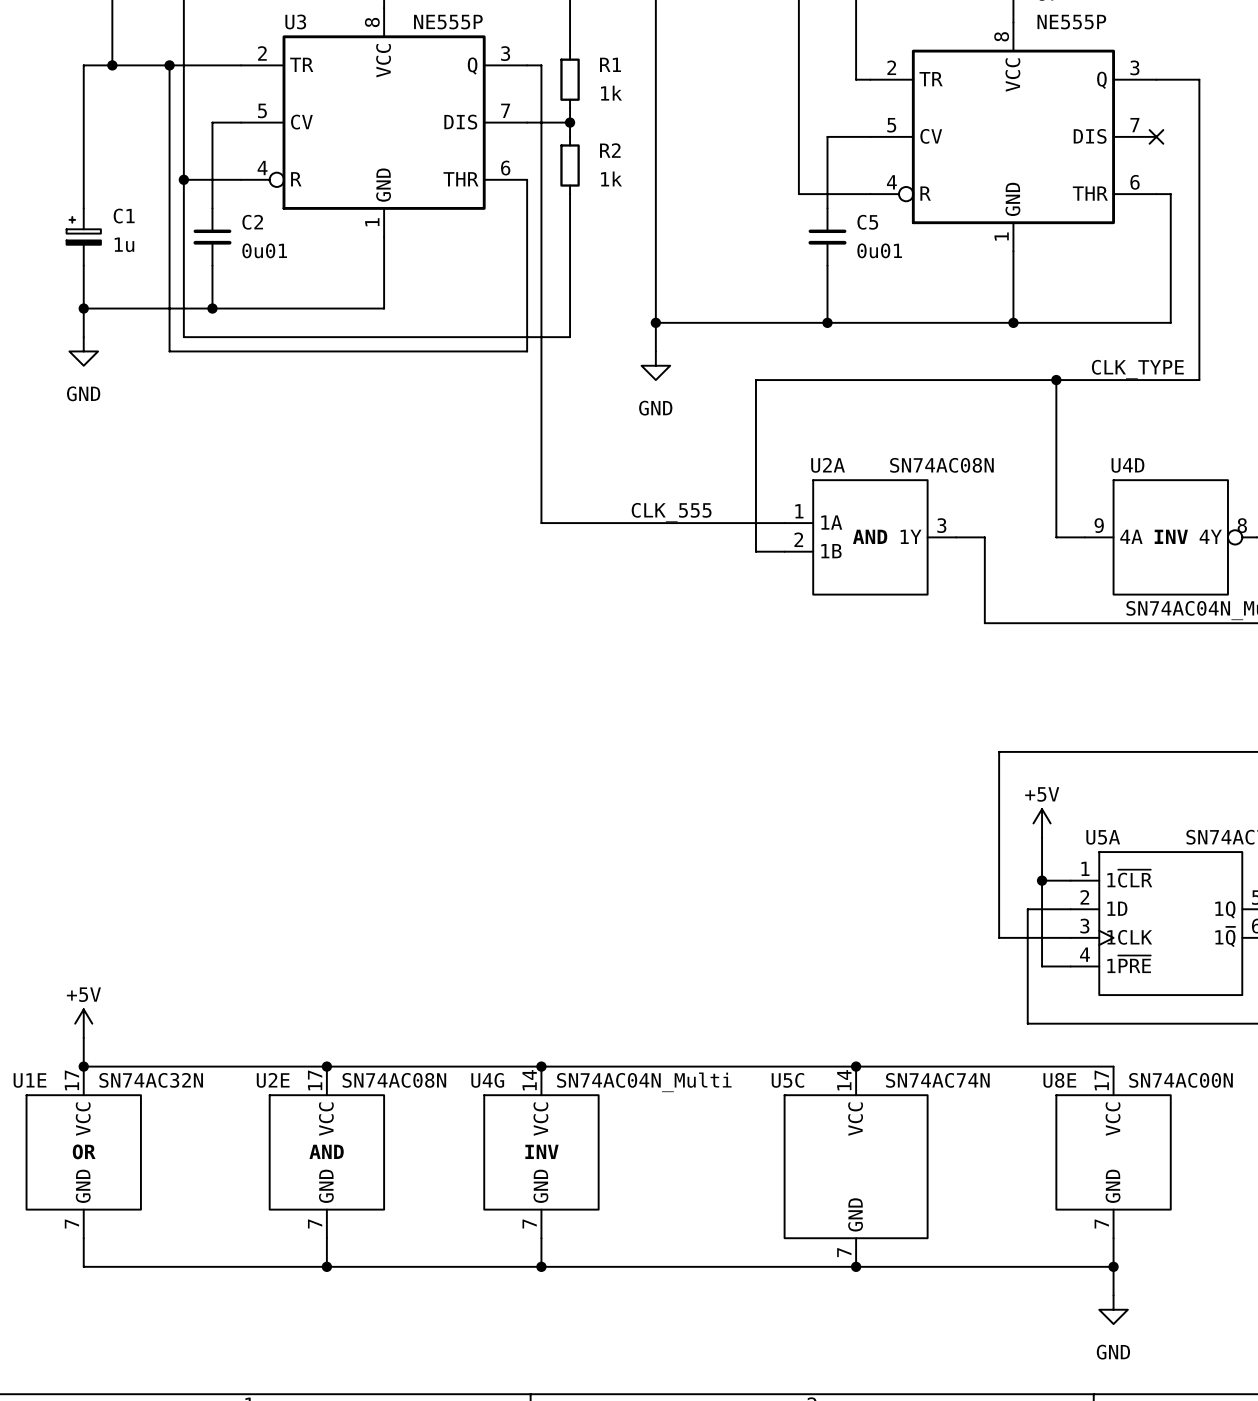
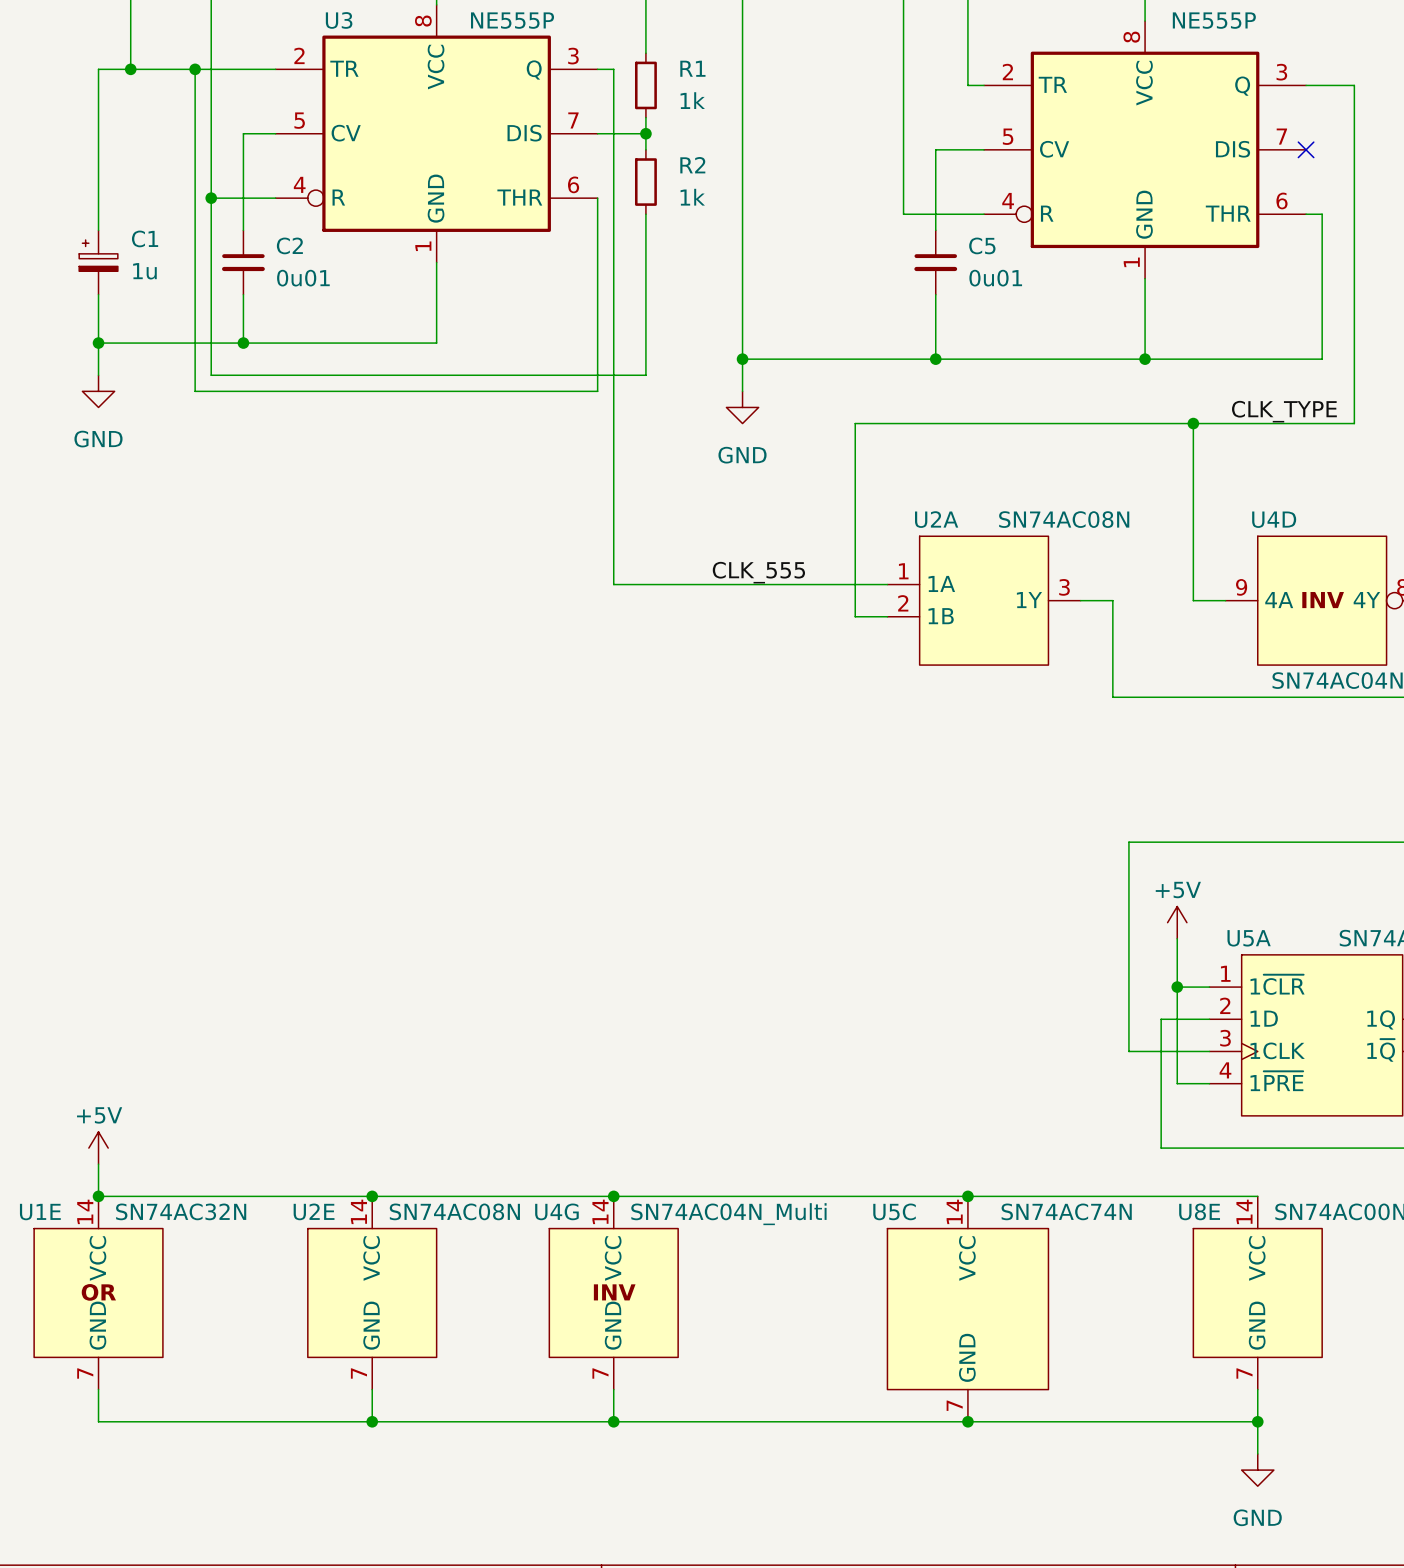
U2A text: AND (870, 536) -> none
U1E pin number: 17 (71, 1080) -> 14 (85, 1211)
U2E pin number: 17 (315, 1080) -> 14 (358, 1211)
U8E pin number: 17 (1101, 1080) -> 14 (1244, 1211)
U2E text: AND (326, 1151) -> none

